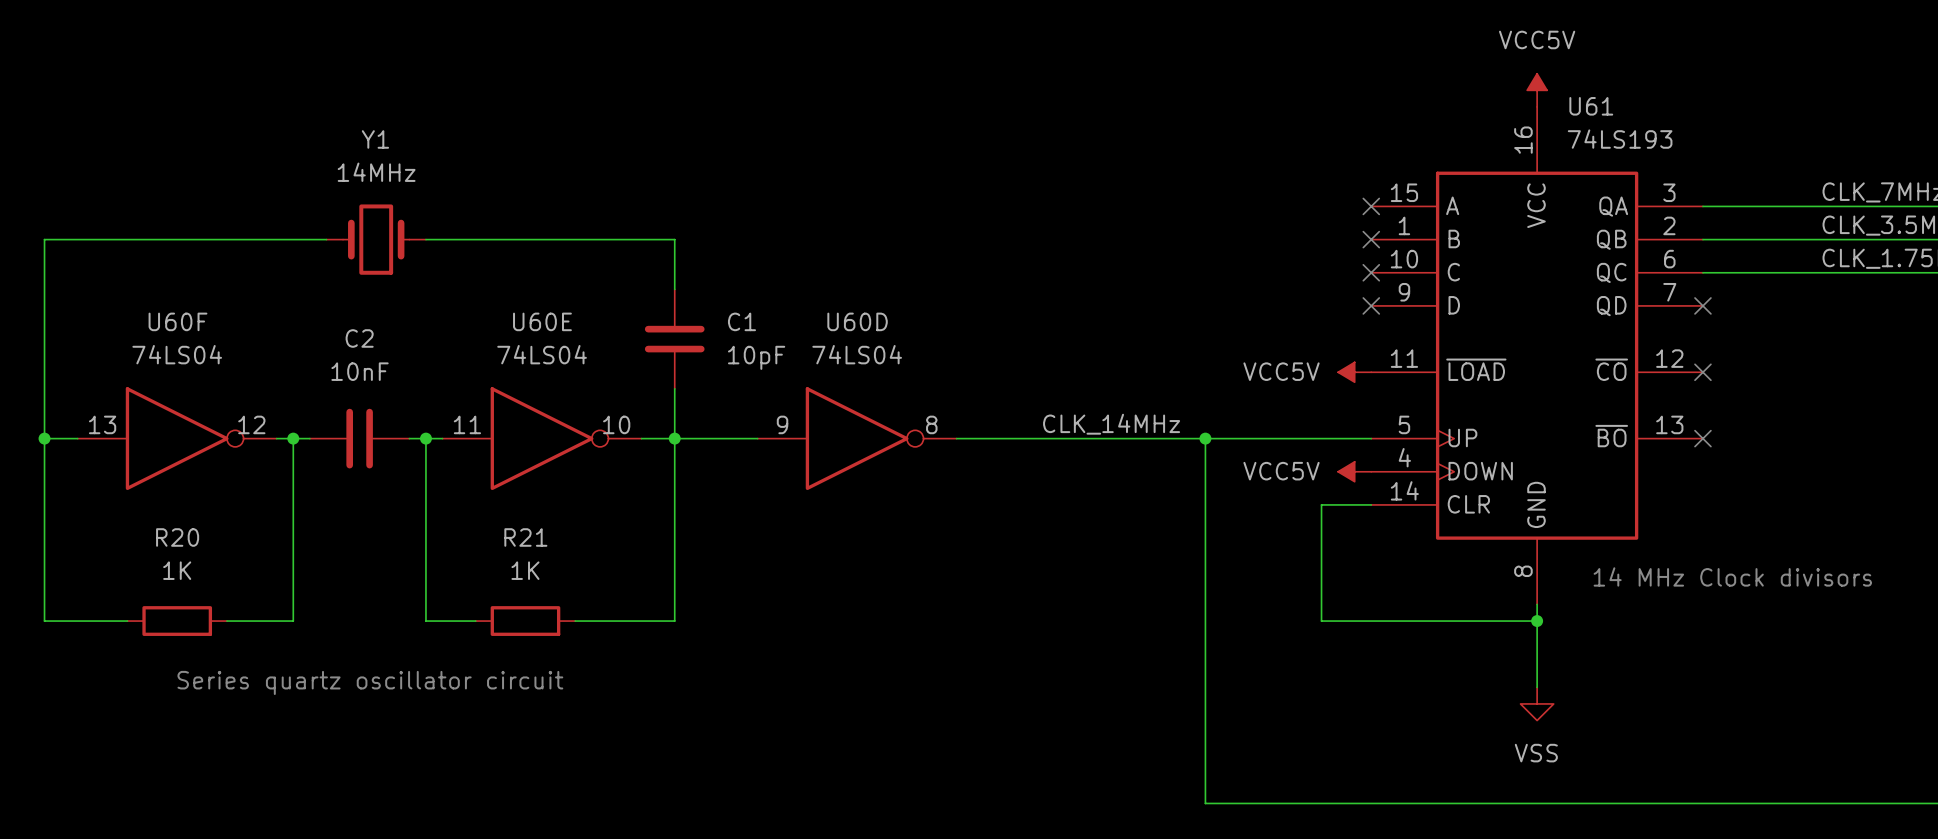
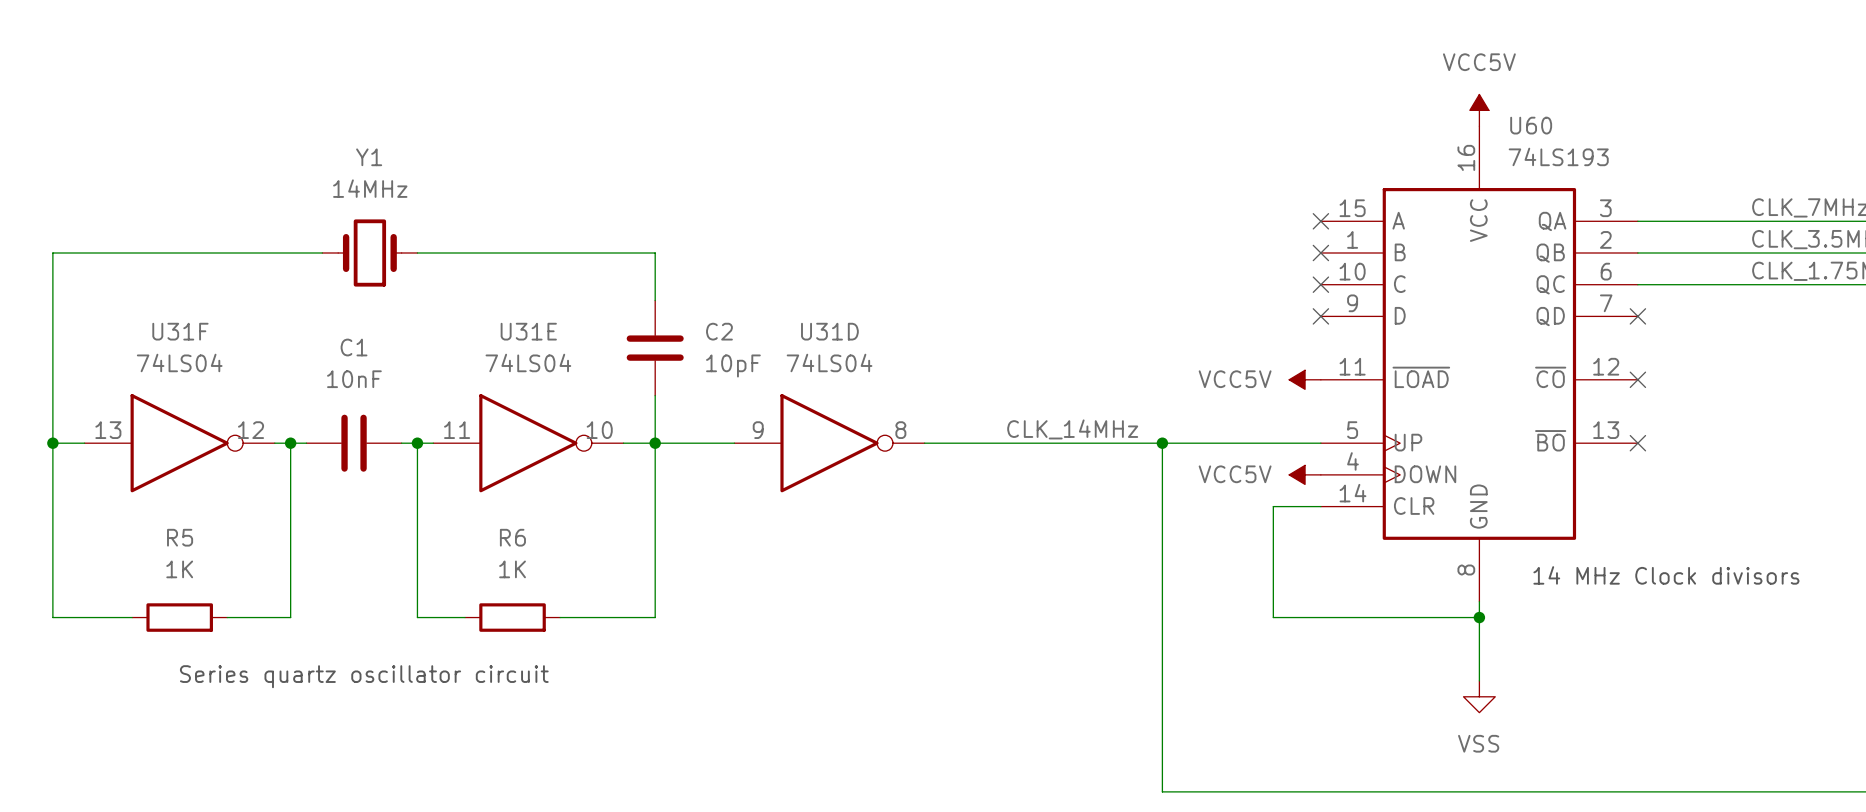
U61 name: U61 (1591, 106) -> U60 (1531, 125)
U60F name: U60F (177, 321) -> U31F (180, 331)
U60E name: U60E (542, 321) -> U31E (528, 331)
C1 name: C1 (741, 321) -> C2 (719, 331)
U60D name: U60D (857, 321) -> U31D (829, 331)
C2 name: C2 (359, 338) -> C1 (354, 347)
R20 name: R20 (177, 537) -> R5 (180, 537)
R21 name: R21 (525, 537) -> R6 (512, 537)

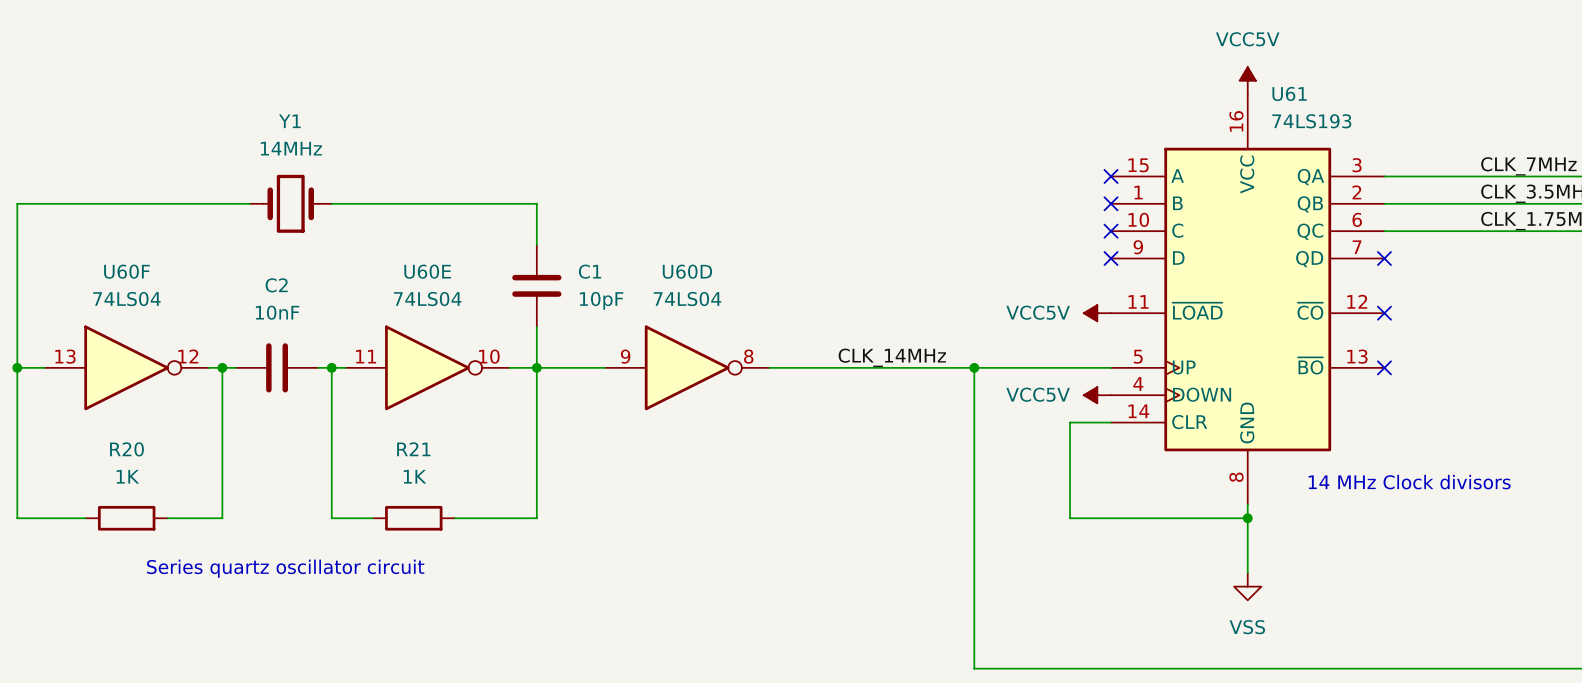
U60 name: U60 (1531, 125) -> U61 (1289, 93)
U31F name: U31F (180, 331) -> U60F (126, 271)
U31E name: U31E (528, 331) -> U60E (427, 271)
C2 name: C2 (719, 331) -> C1 (590, 271)
U31D name: U31D (829, 331) -> U60D (687, 271)
C1 name: C1 (354, 347) -> C2 (276, 285)
R5 name: R5 (180, 537) -> R20 (126, 449)
R6 name: R6 (512, 537) -> R21 (413, 449)

